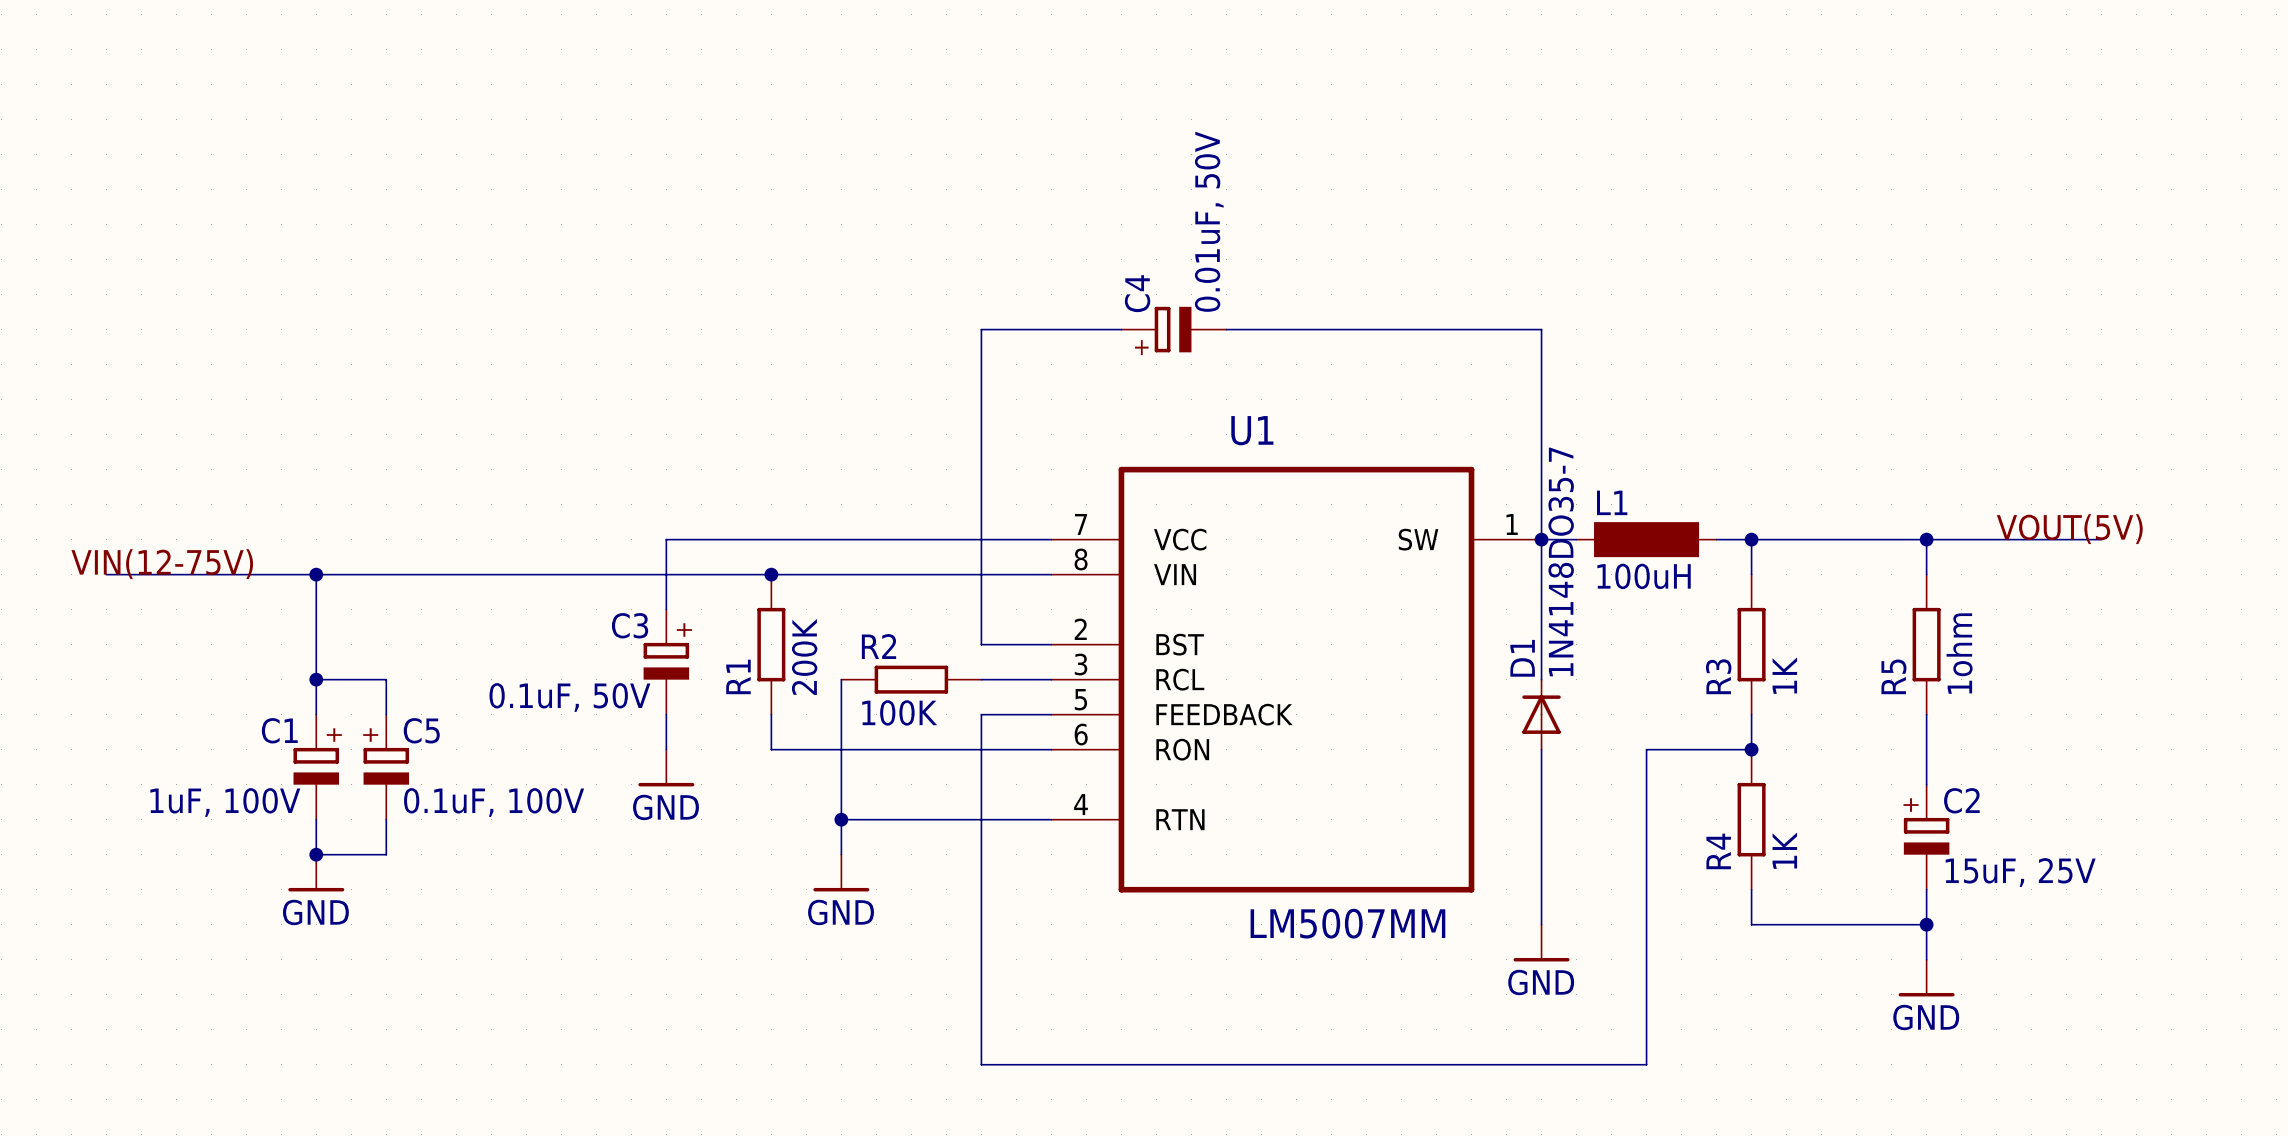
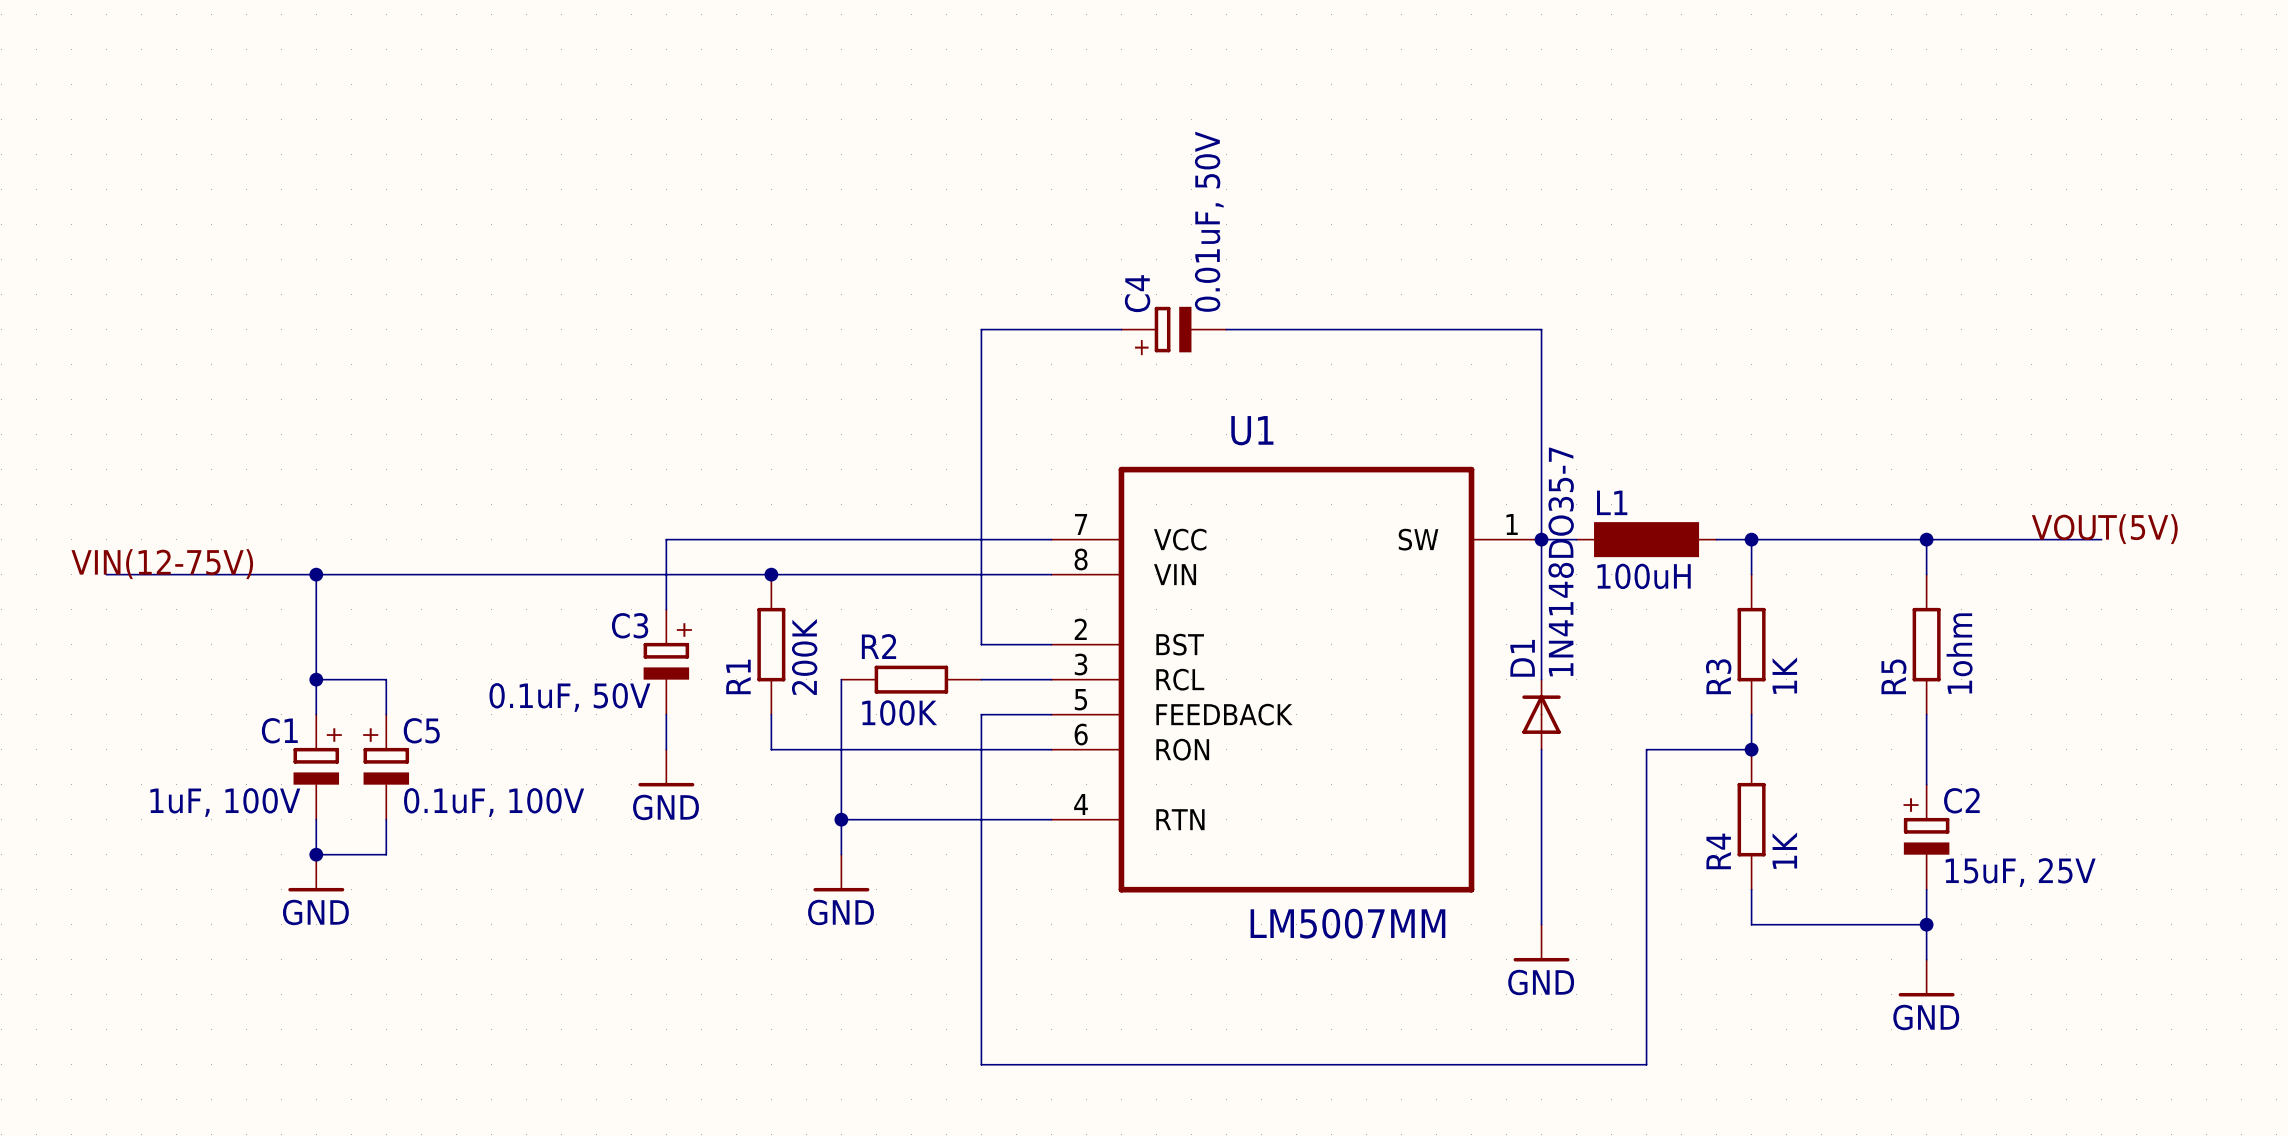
label position: VOUT(5V) (2069, 529) -> VOUT(5V) (2104, 529)

